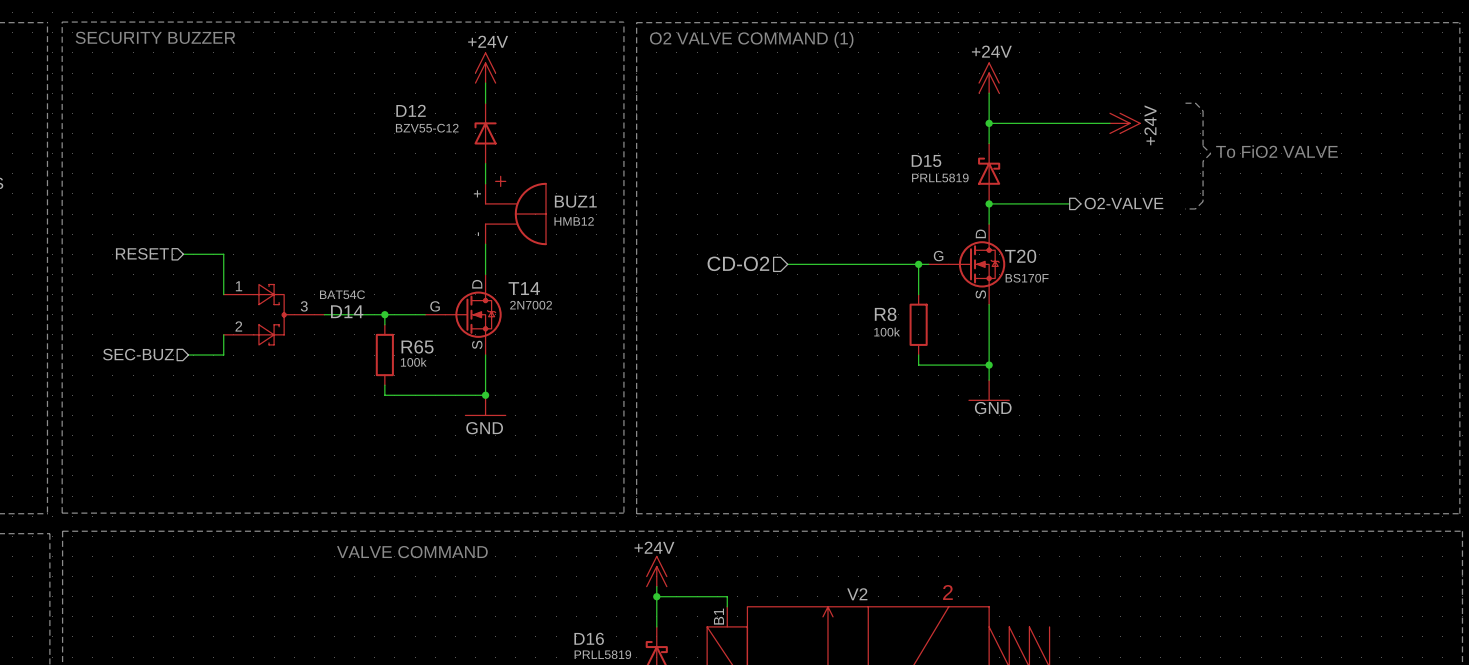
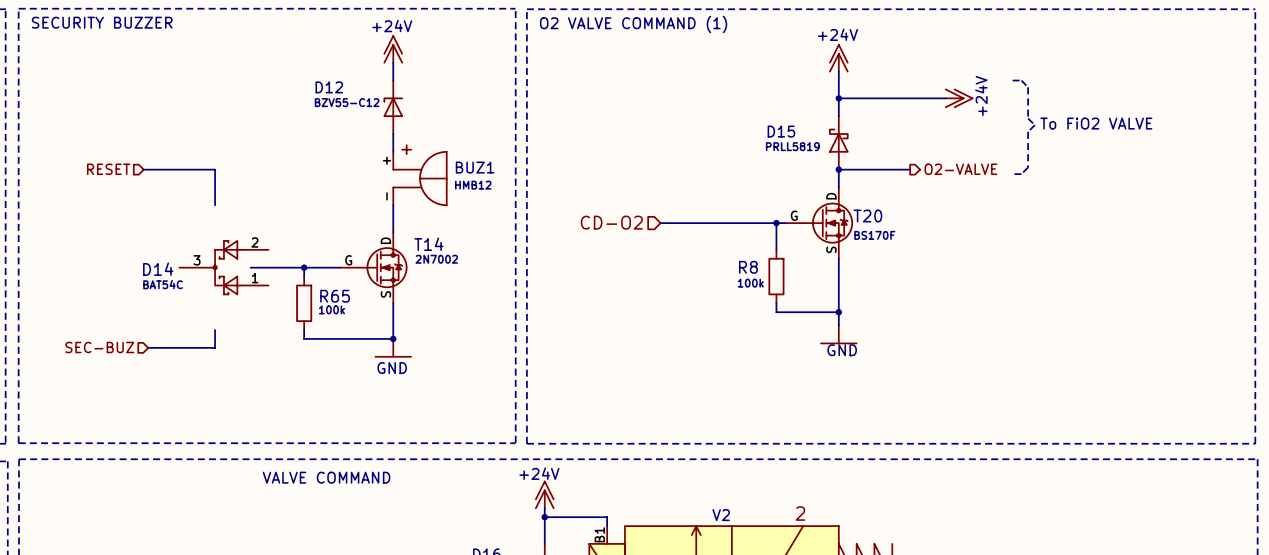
wire: none -> (143, 169) (215, 169) (215, 205)
hierarchical label position: RESET (142, 253) -> RESET (108, 169)
wire: (183, 254) (223, 254) (223, 294) -> none
D14 rotation: 0° (270, 314) -> 180° (227, 267)
wire: (223, 334) (223, 355) (188, 355) -> none
hierarchical label position: SEC-BUZ (138, 354) -> SEC-BUZ (99, 347)
wire: none -> (215, 330) (215, 347) (148, 347)

